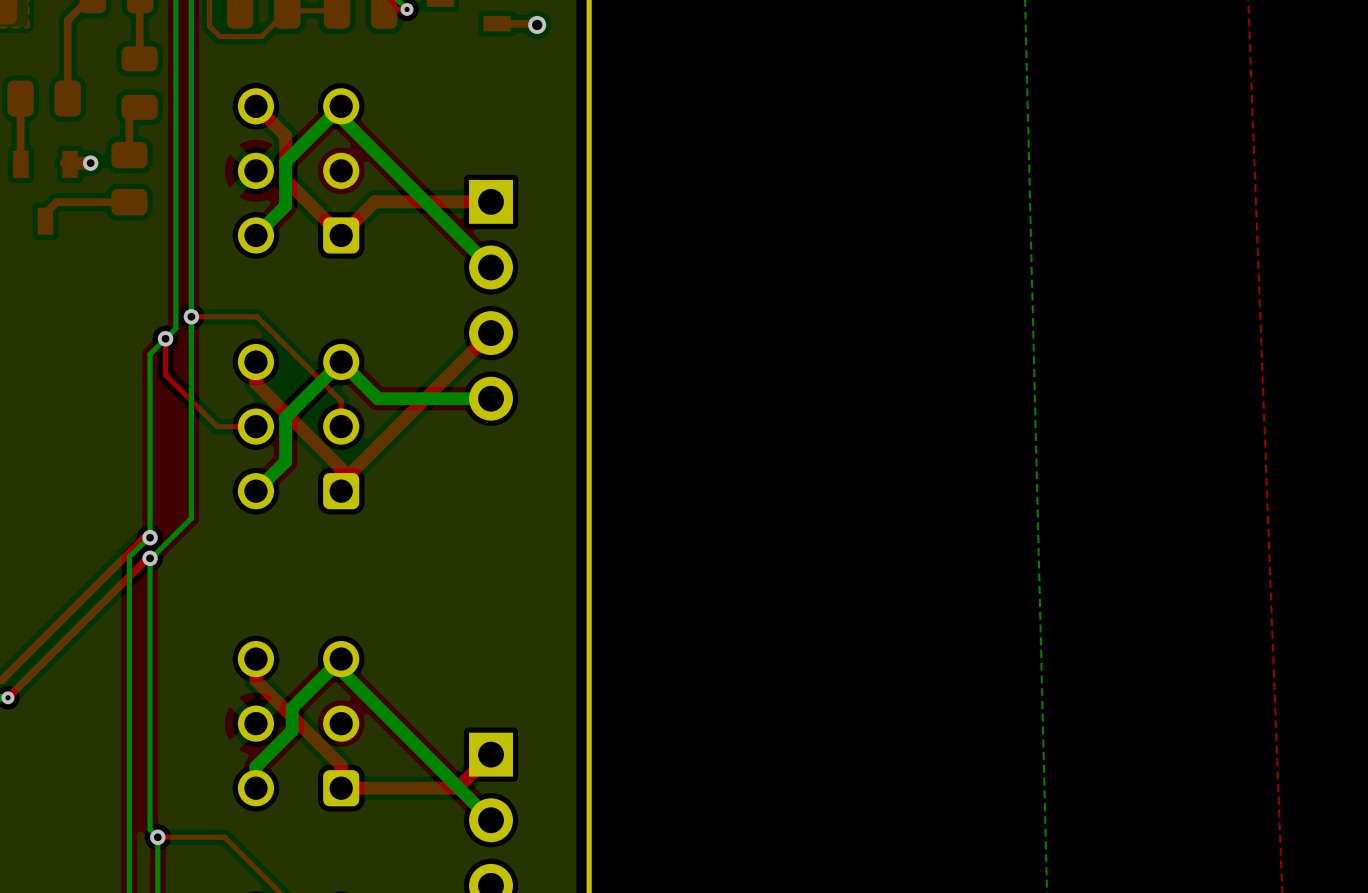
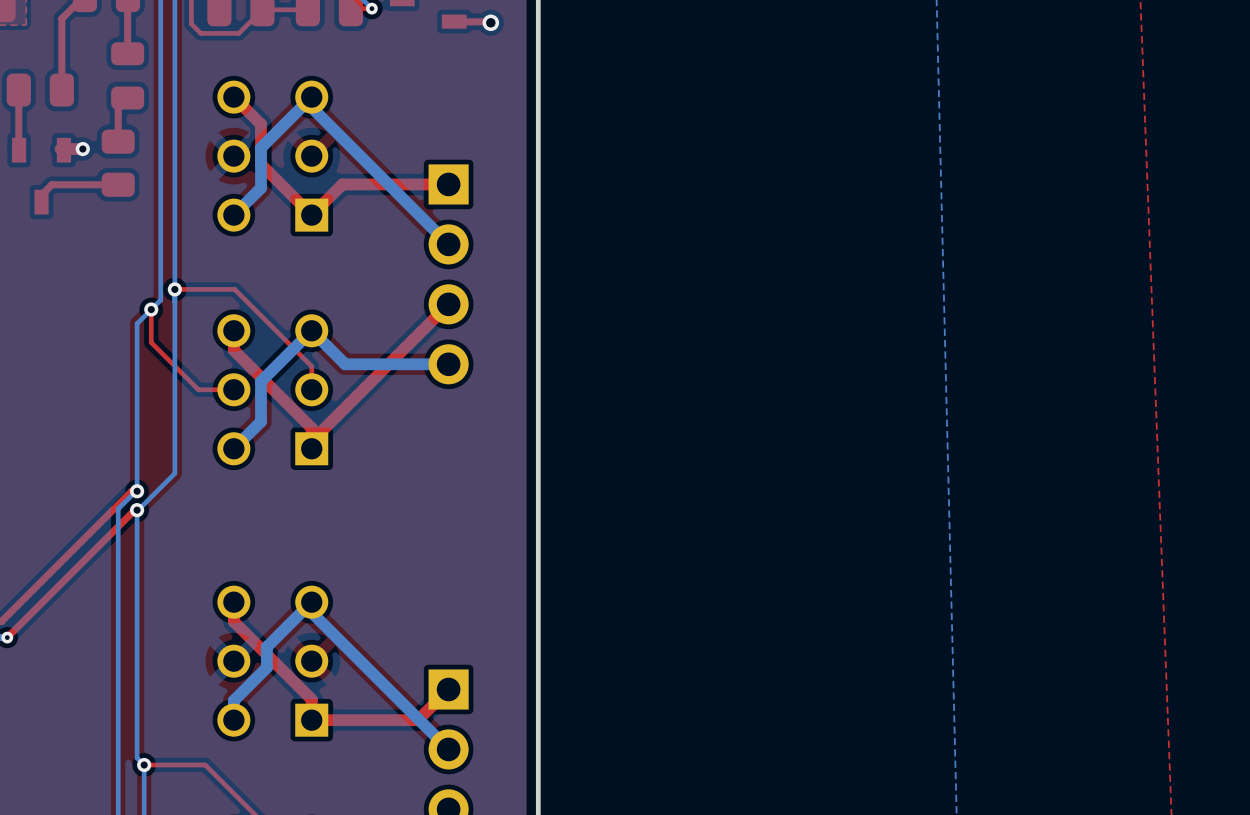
part footprint: [237, 88, 360, 254] -> [217, 80, 329, 232]
part footprint: [237, 343, 360, 510] -> [217, 314, 329, 466]
part footprint: [237, 640, 360, 807] -> [217, 585, 329, 737]

